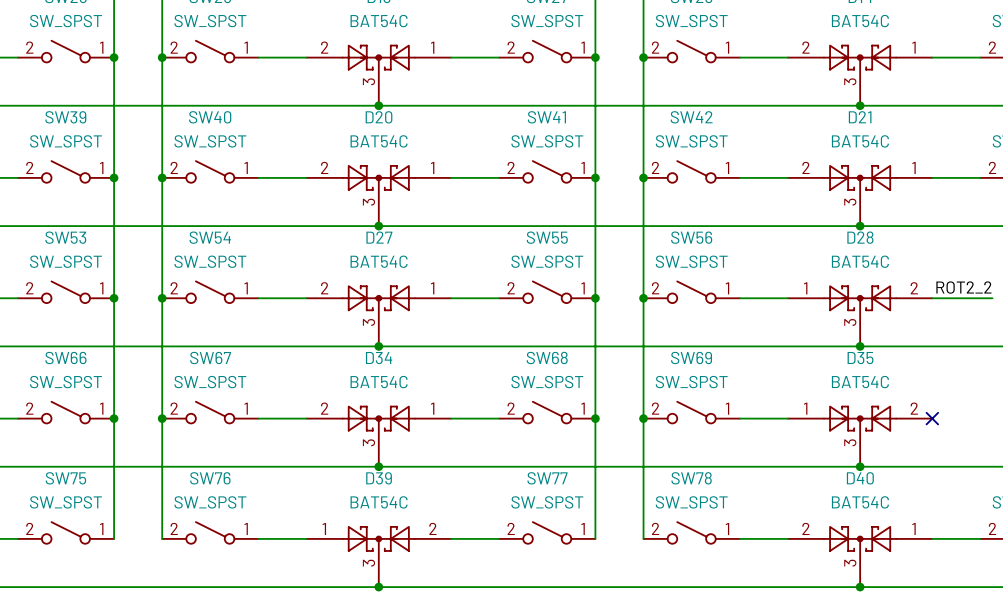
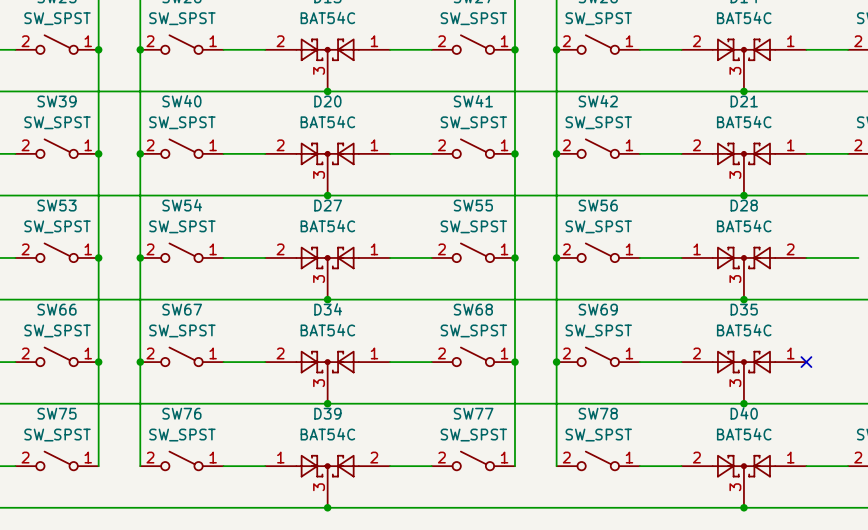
label: ROT2_2 (963, 287) -> none
D35 flip: as is (860, 418) -> left-right (743, 362)

